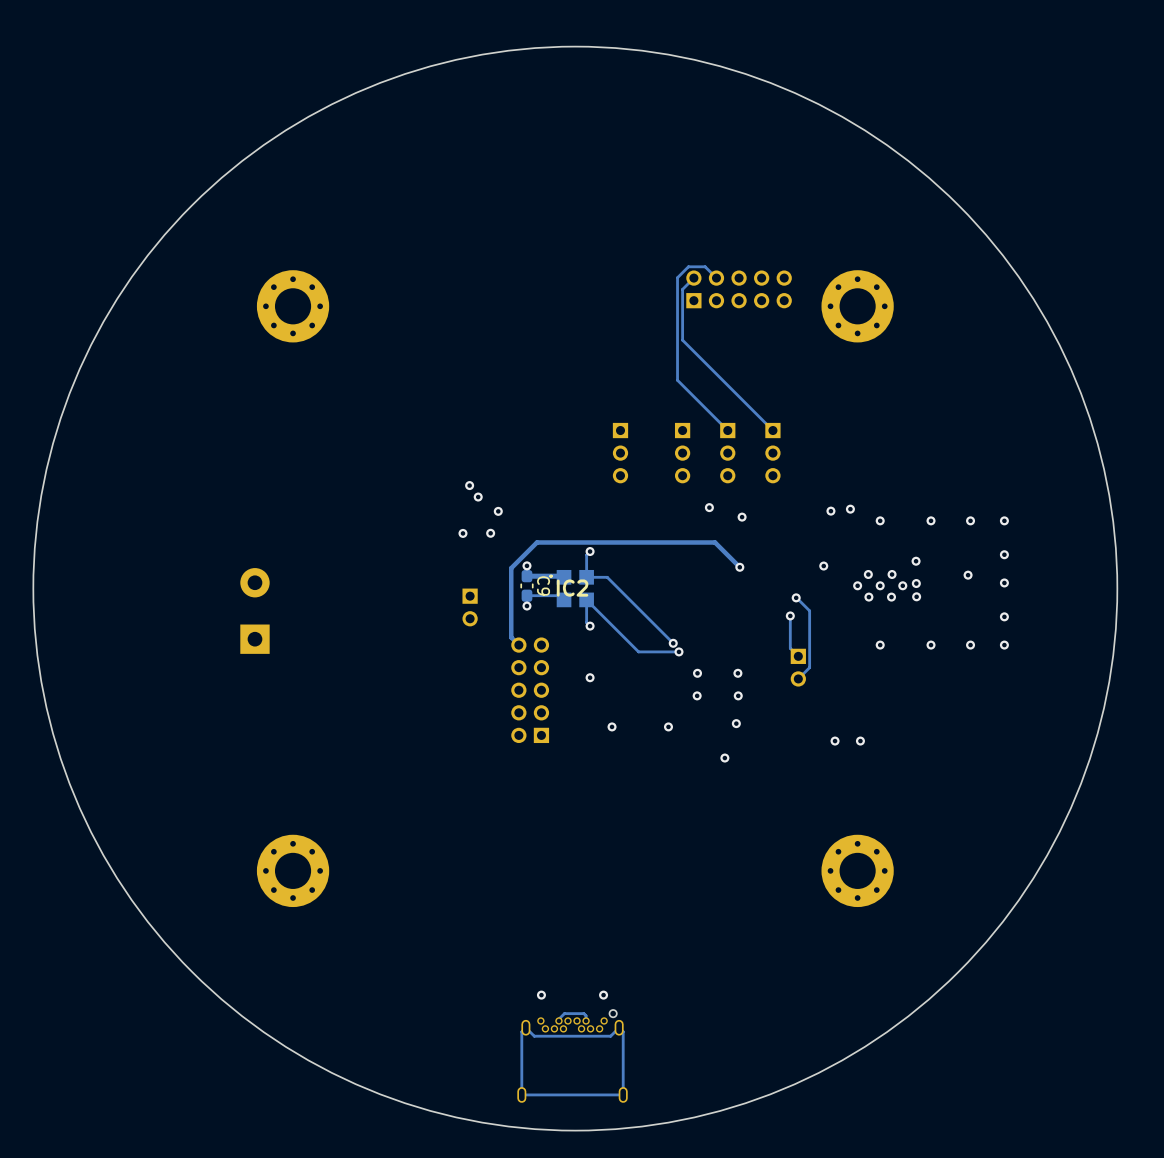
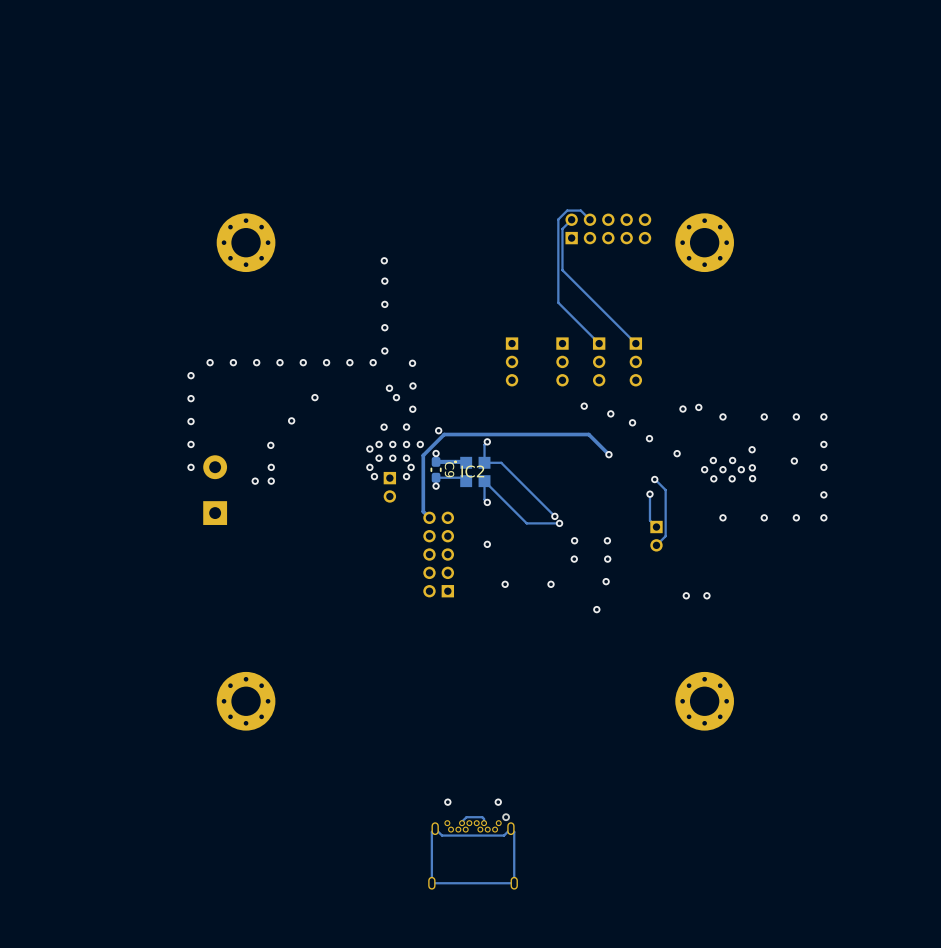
round board edge: [33, 46, 1118, 1131] -> none
via: none -> (384, 260)
via: none -> (384, 281)
via: none -> (384, 304)
via: none -> (384, 327)
via: none -> (384, 351)
via: none -> (210, 362)
via: none -> (233, 362)
via: none -> (256, 362)
via: none -> (279, 362)
via: none -> (303, 362)
via: none -> (326, 362)
via: none -> (349, 362)
via: none -> (373, 362)
via: none -> (412, 363)
via: none -> (191, 375)
via: none -> (412, 385)
via: none -> (314, 397)
via: none -> (191, 398)
via: none -> (291, 420)
via: none -> (191, 421)
via: none -> (632, 422)
via: none -> (438, 430)
via: none -> (649, 438)
via: none -> (191, 444)
via: none -> (379, 444)
via: none -> (392, 444)
via: none -> (406, 444)
via: none -> (420, 444)
via: none -> (270, 445)
via: none -> (369, 449)
via: none -> (379, 458)
via: none -> (392, 458)
via: none -> (406, 458)
via: none -> (191, 467)
via: none -> (271, 467)
via: none -> (369, 467)
via: none -> (411, 467)
via: none -> (374, 476)
via: none -> (406, 476)
via: none -> (255, 481)
via: none -> (271, 481)

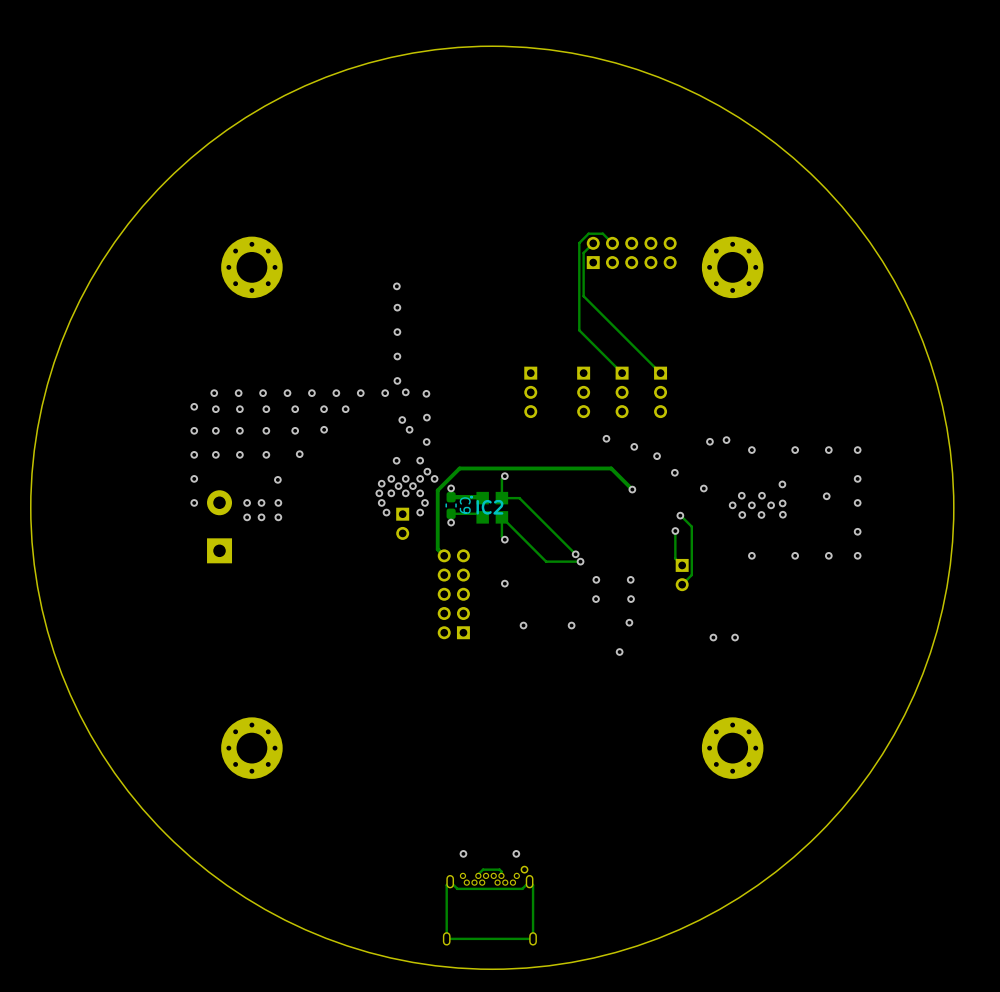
round board edge: none -> [30, 45, 955, 970]
via: none -> (405, 392)
via: none -> (215, 409)
via: none -> (239, 409)
via: none -> (266, 409)
via: none -> (295, 409)
via: none -> (324, 409)
via: none -> (345, 409)
via: none -> (215, 430)
via: none -> (239, 430)
via: none -> (266, 430)
via: none -> (295, 430)
via: none -> (215, 454)
via: none -> (239, 454)
via: none -> (266, 454)
via: (438, 430) -> none
via: none -> (427, 471)
via: none -> (398, 486)
via: none -> (412, 486)
via: none -> (379, 493)
via: none -> (247, 502)
via: none -> (261, 502)
via: none -> (247, 517)

